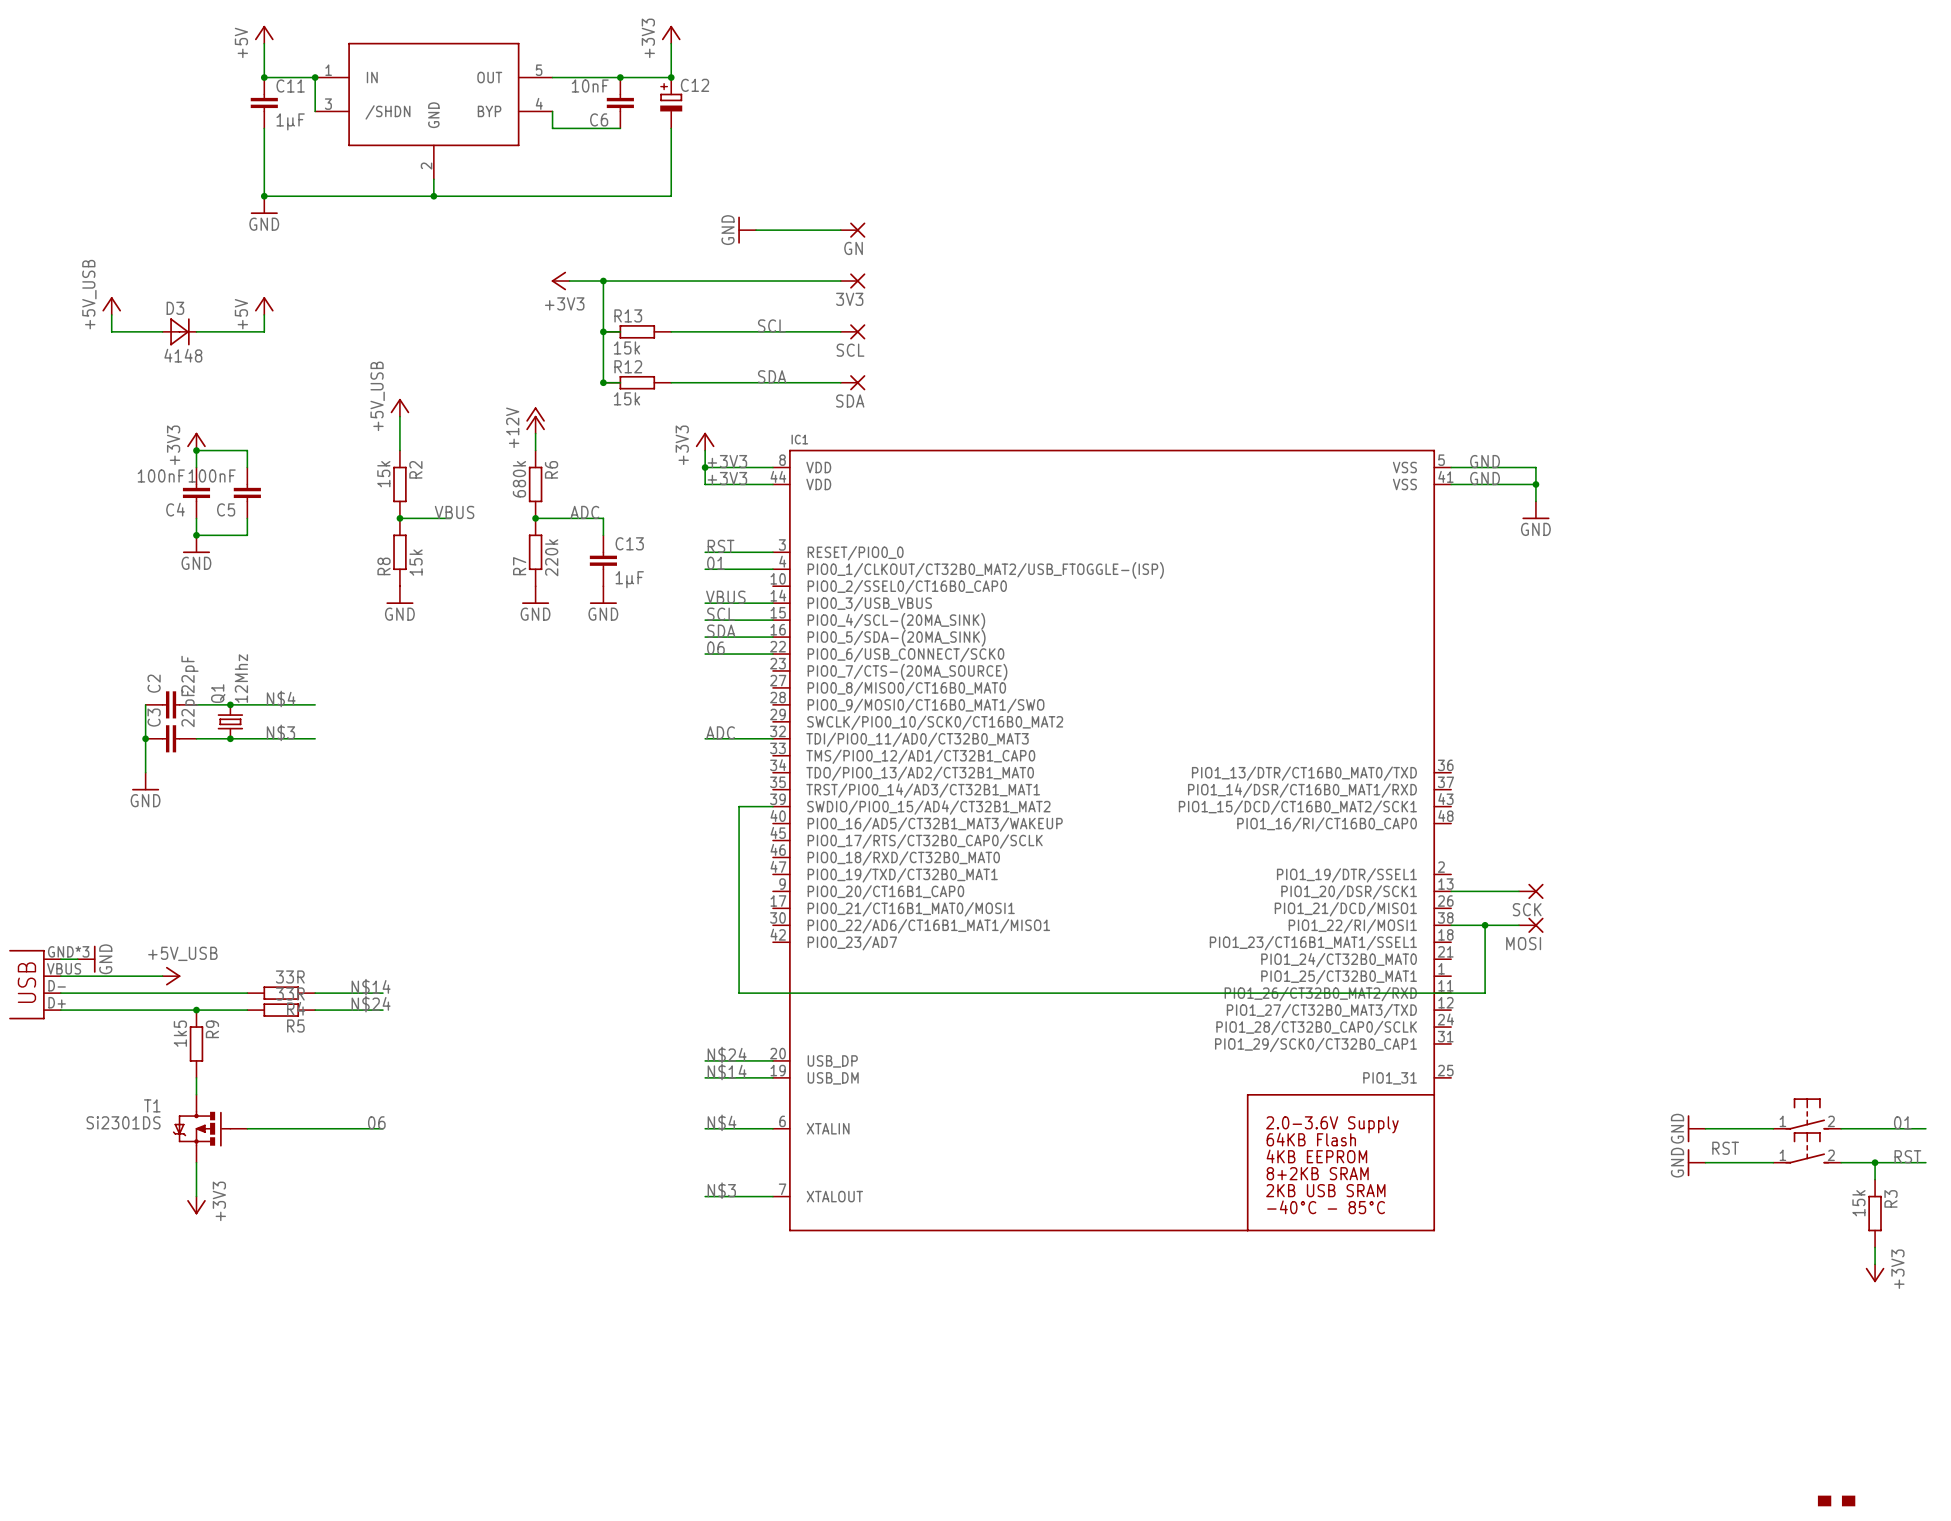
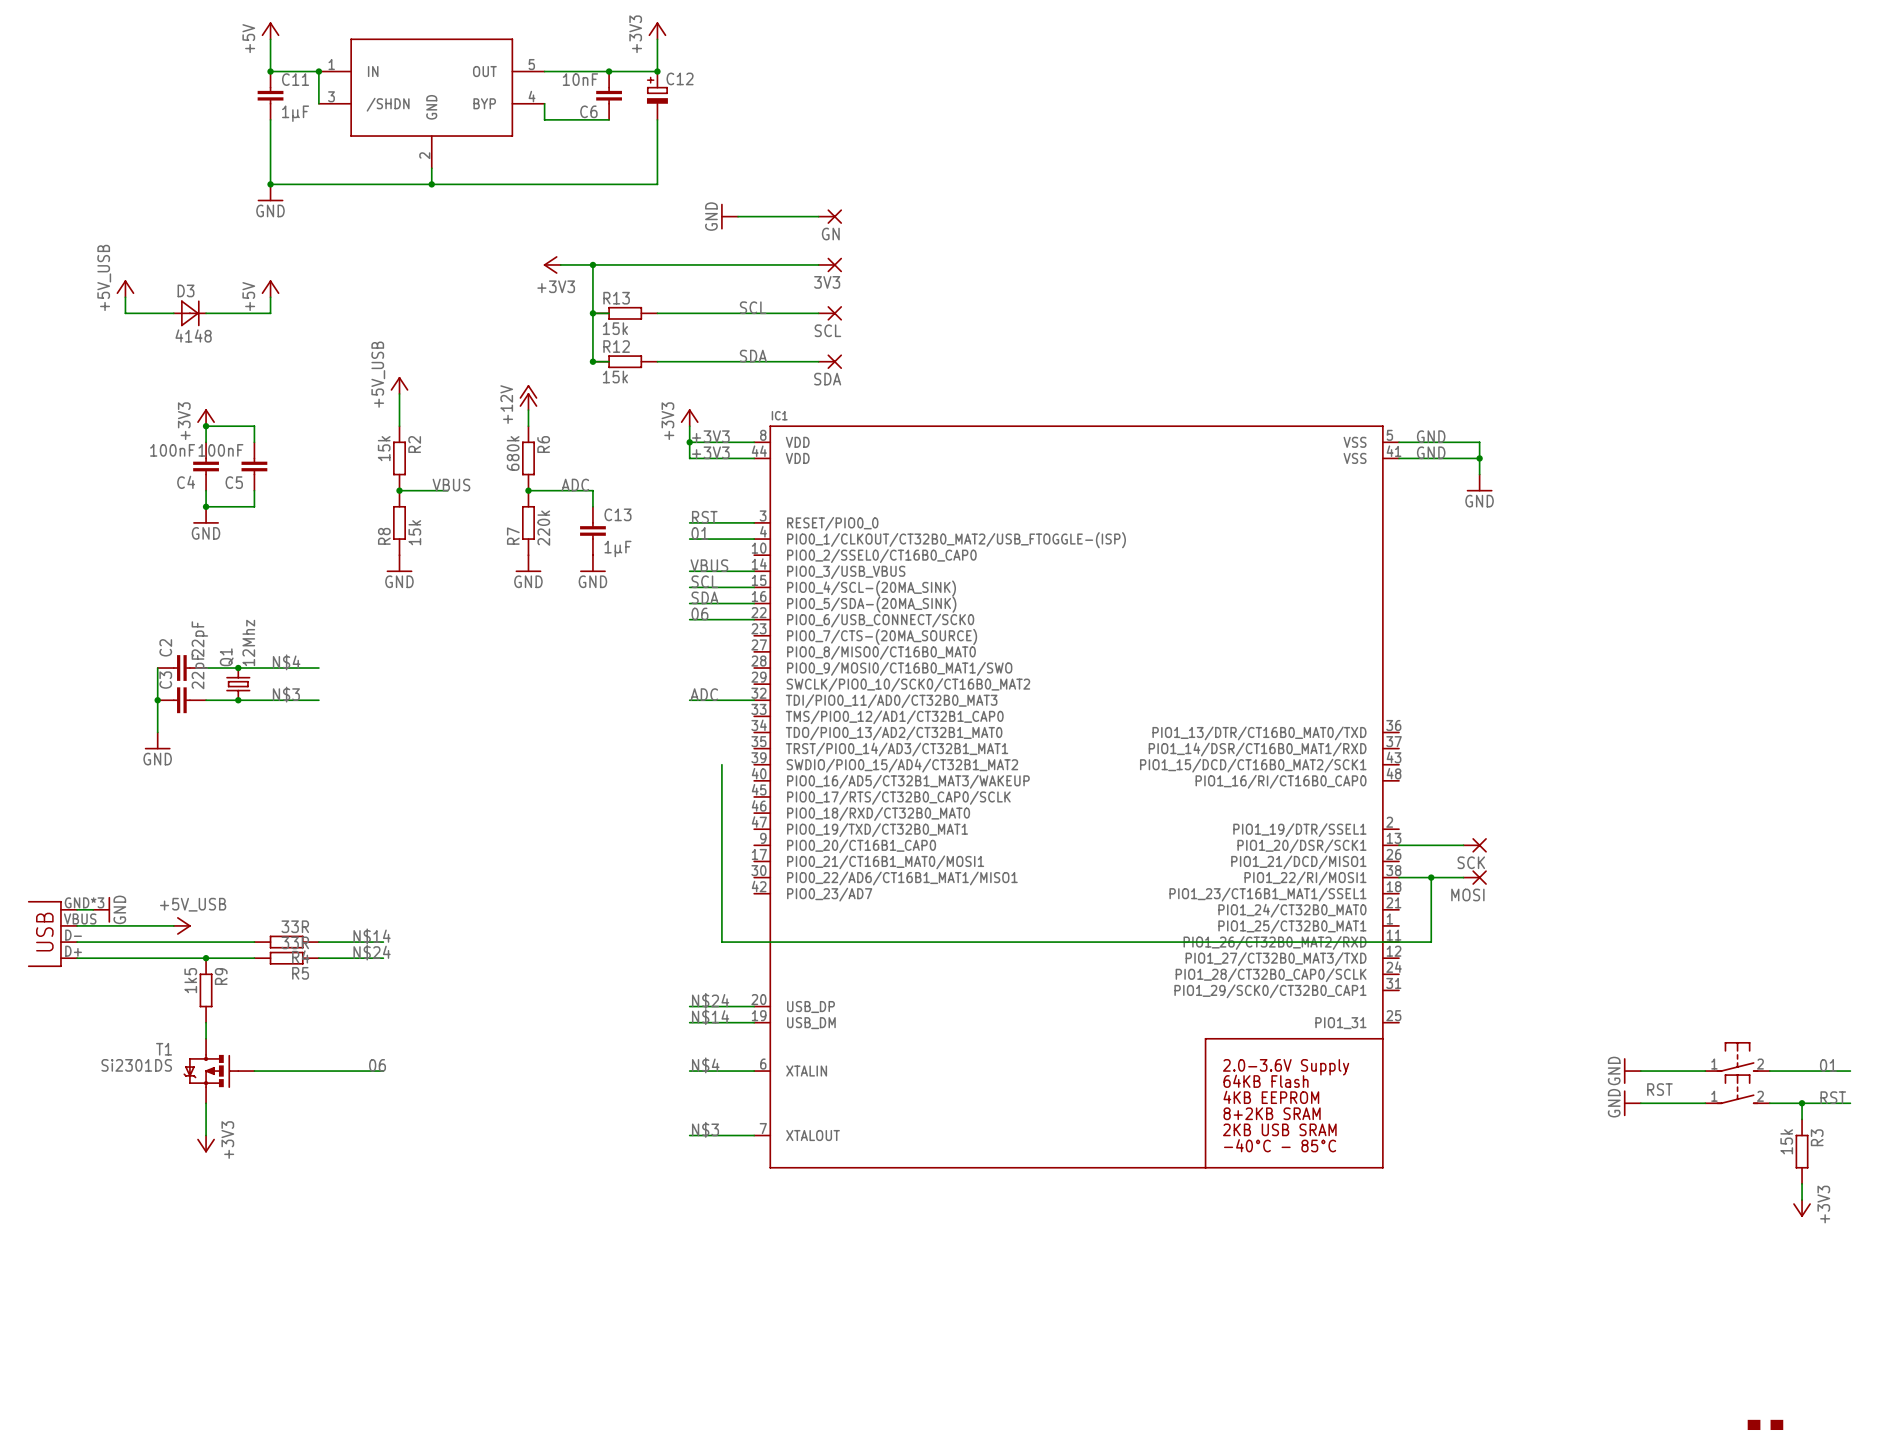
wire: (739, 806) (772, 806) -> none

